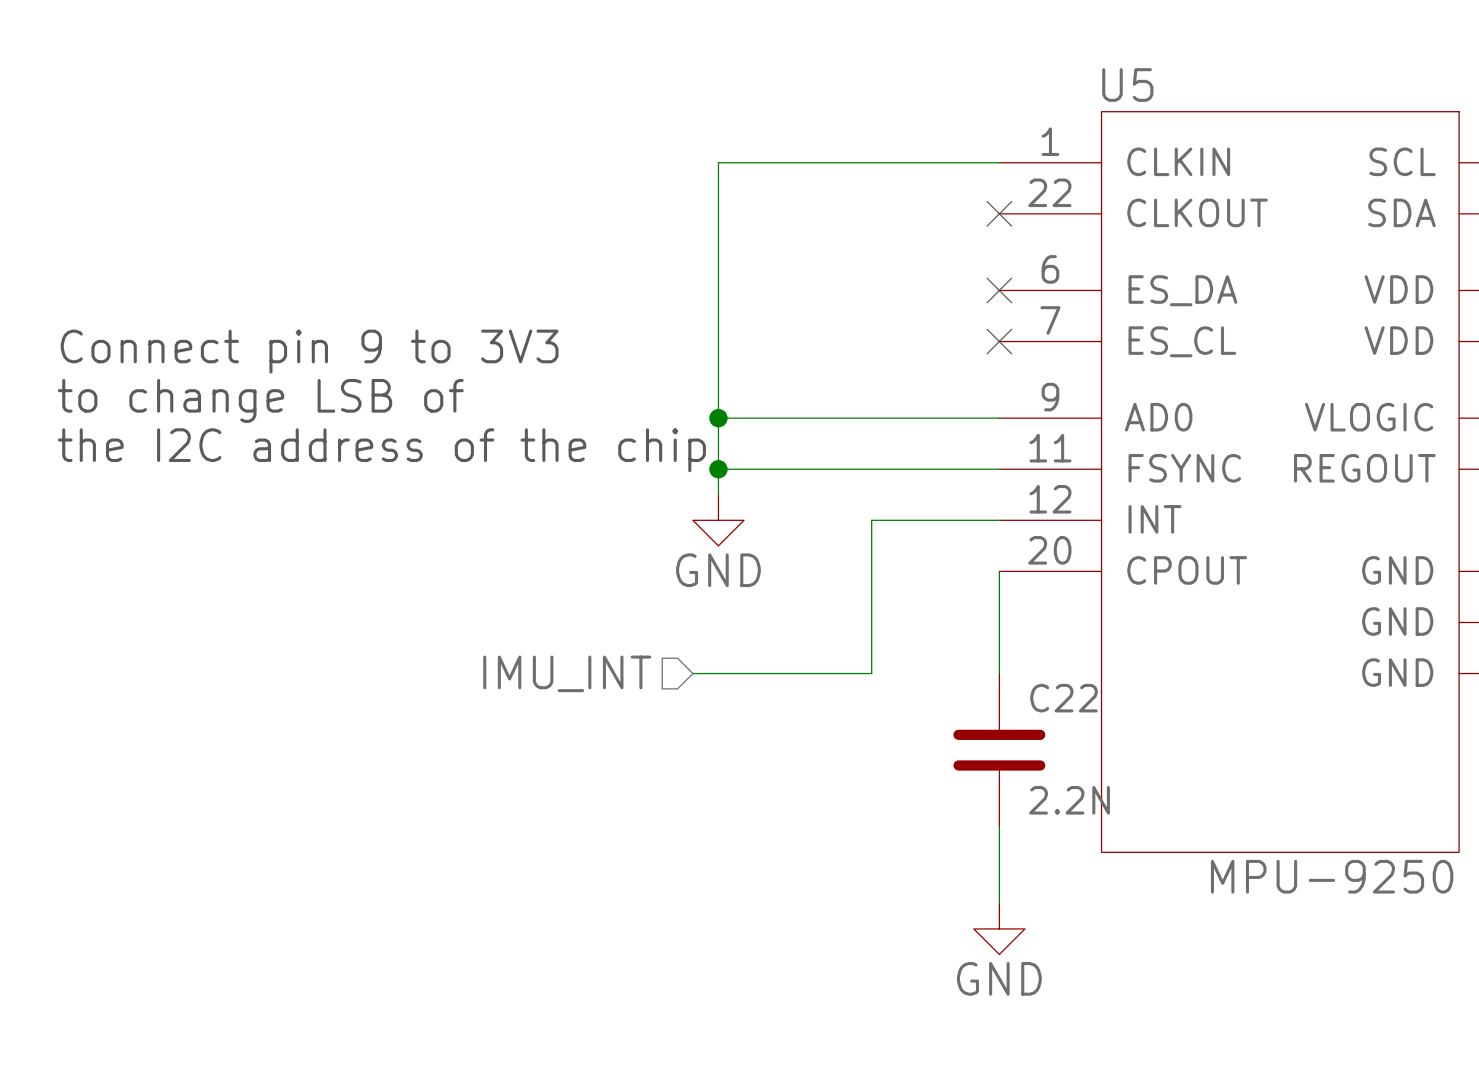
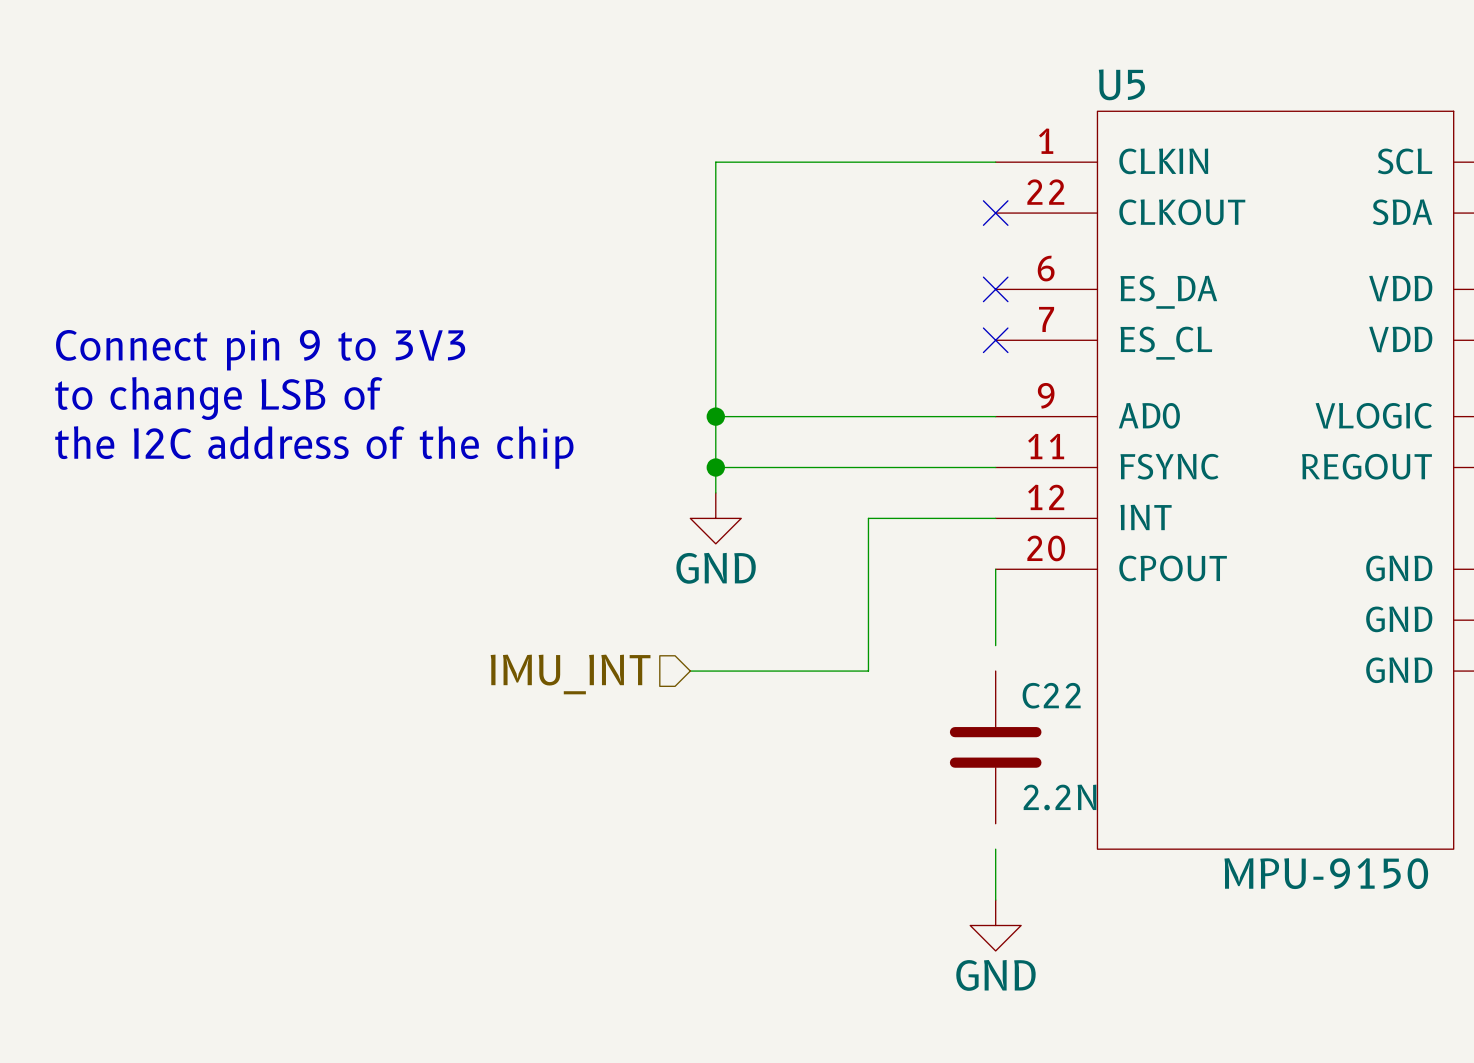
wire: (999, 648) (999, 673) -> none
wire: (999, 826) (999, 852) -> none
U5 value: MPU-9250 (1332, 876) -> MPU-9150 (1326, 873)

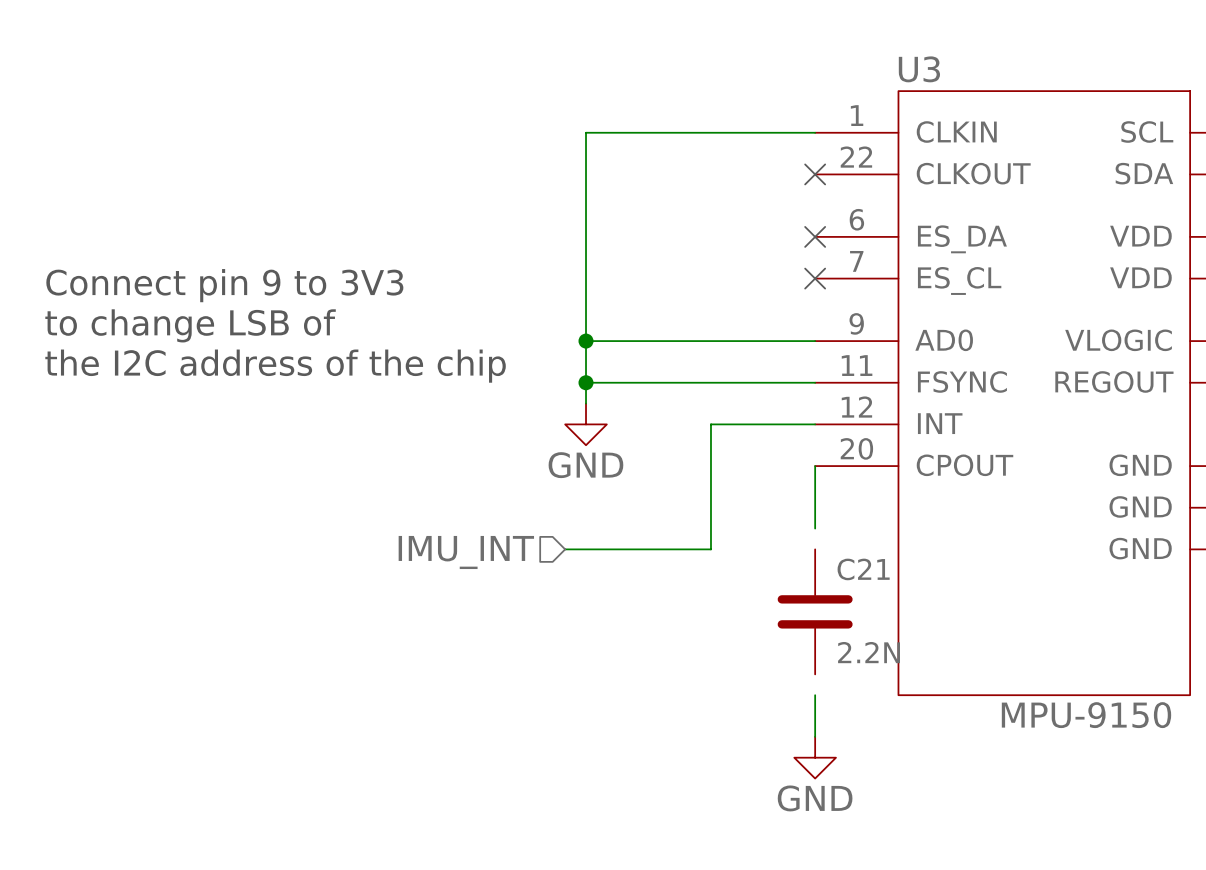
U5 name: U5 (1121, 84) -> U3 (919, 69)
C22 name: C22 (1051, 695) -> C21 (863, 569)

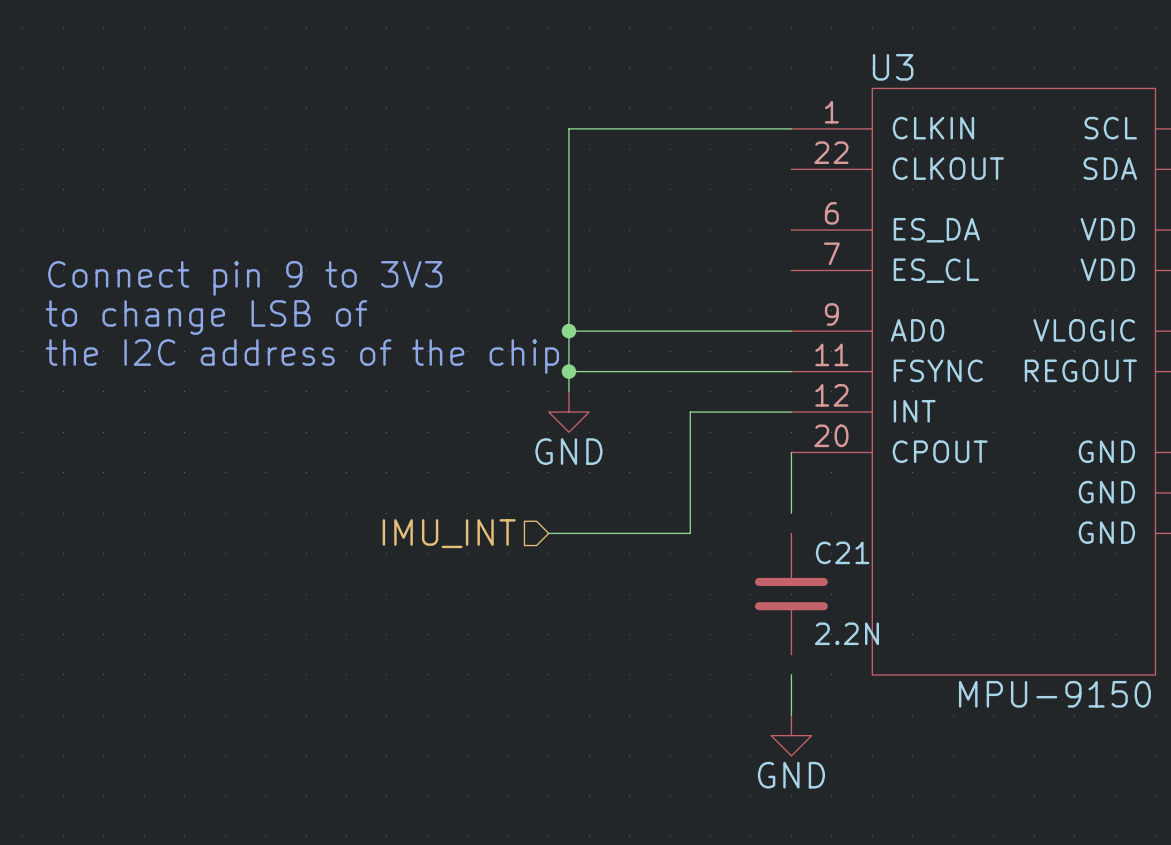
no-connect mark: (815, 174) -> none
no-connect mark: (815, 236) -> none
no-connect mark: (815, 278) -> none

